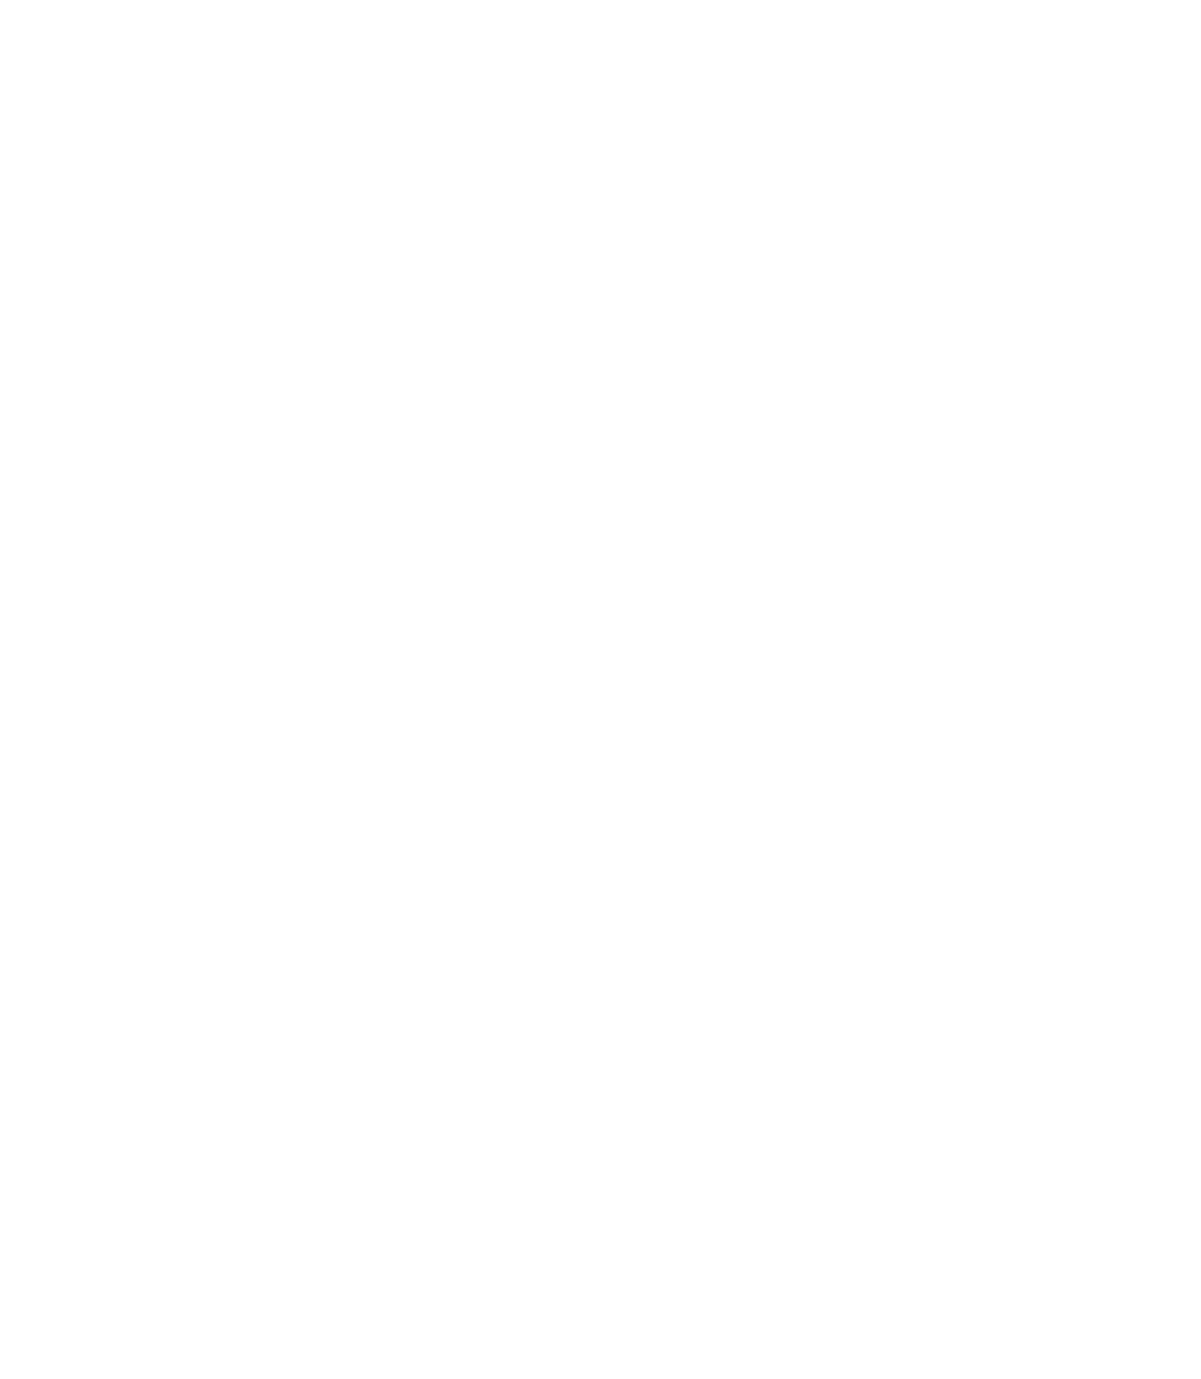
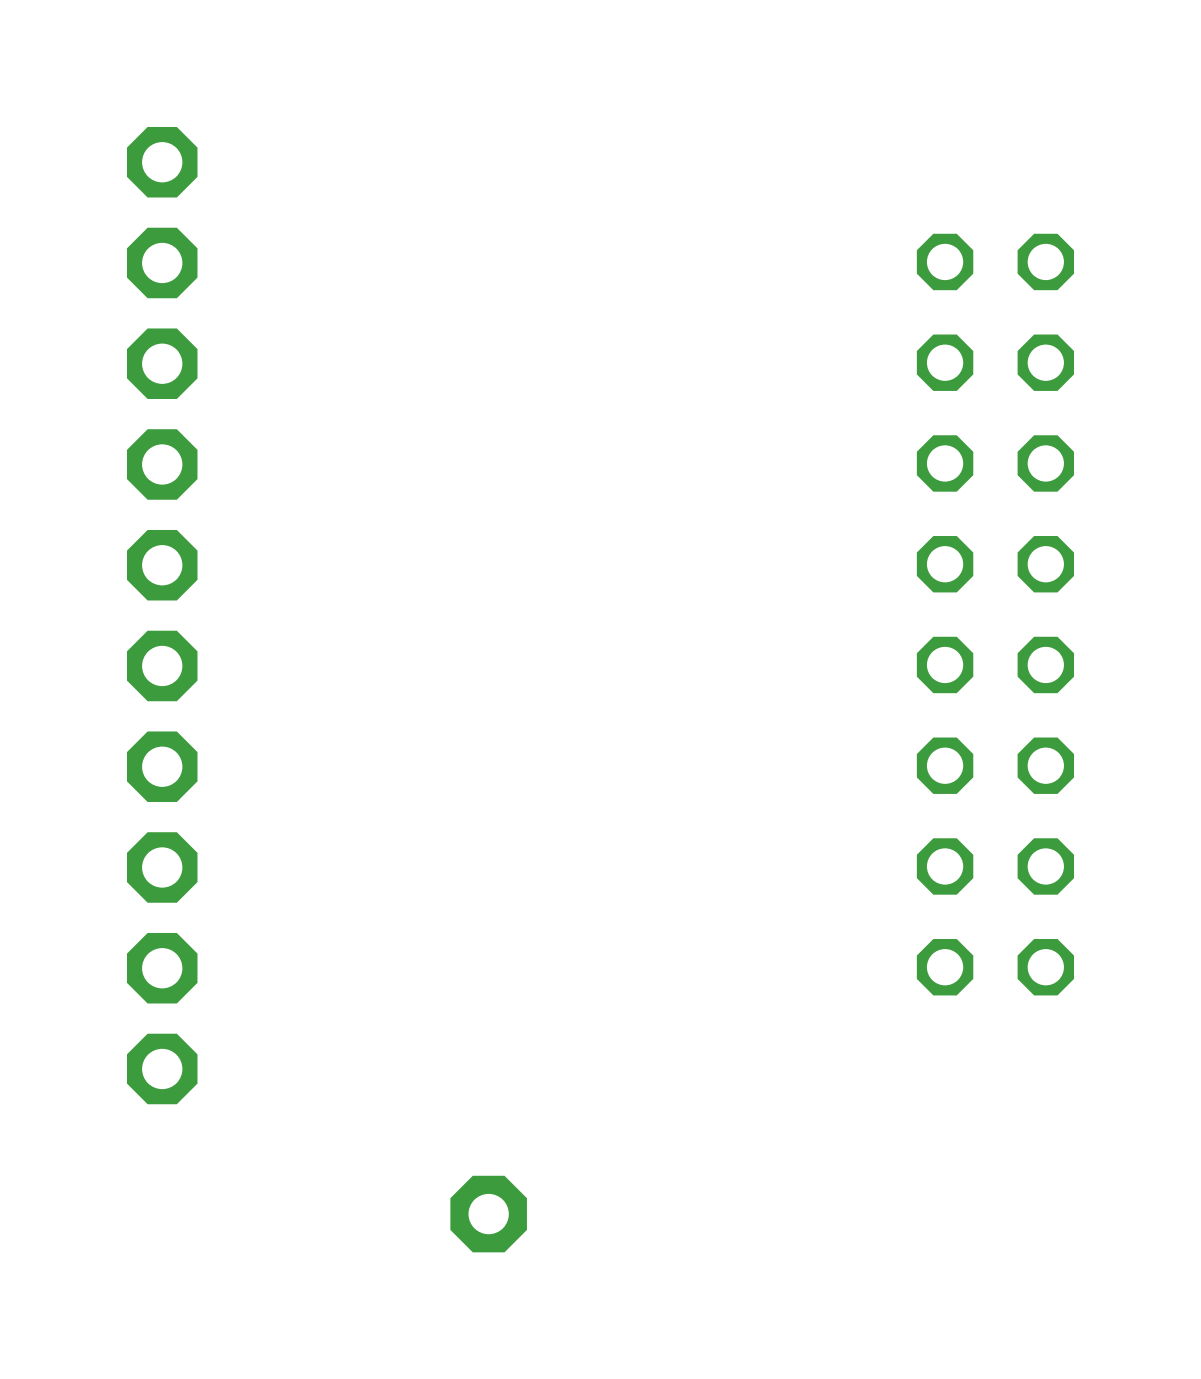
part: none -> (995, 614)
part: none -> (162, 615)
part: none -> (488, 1214)

